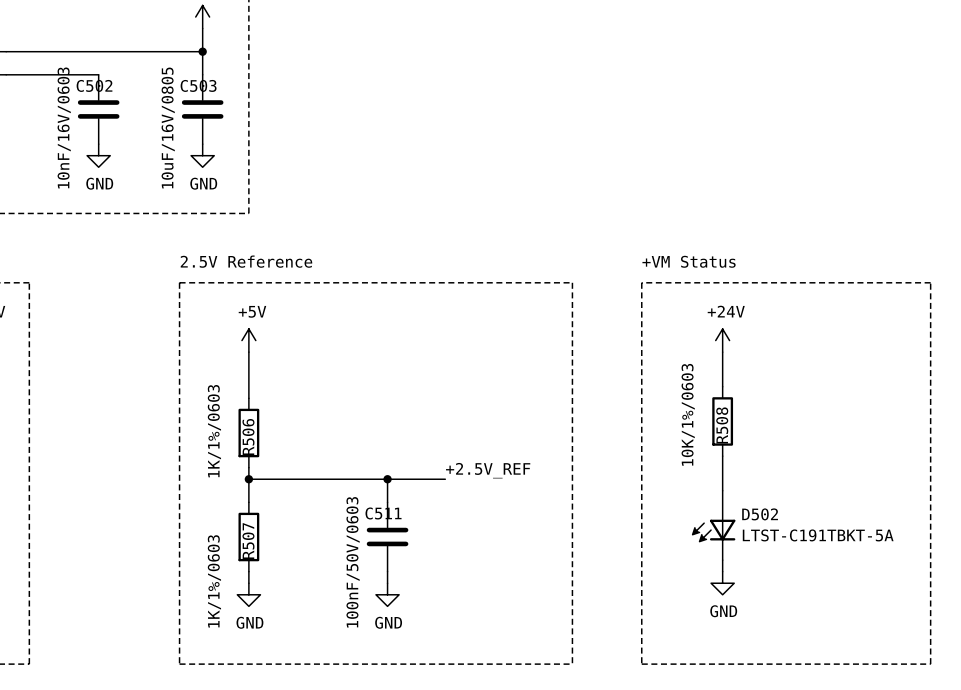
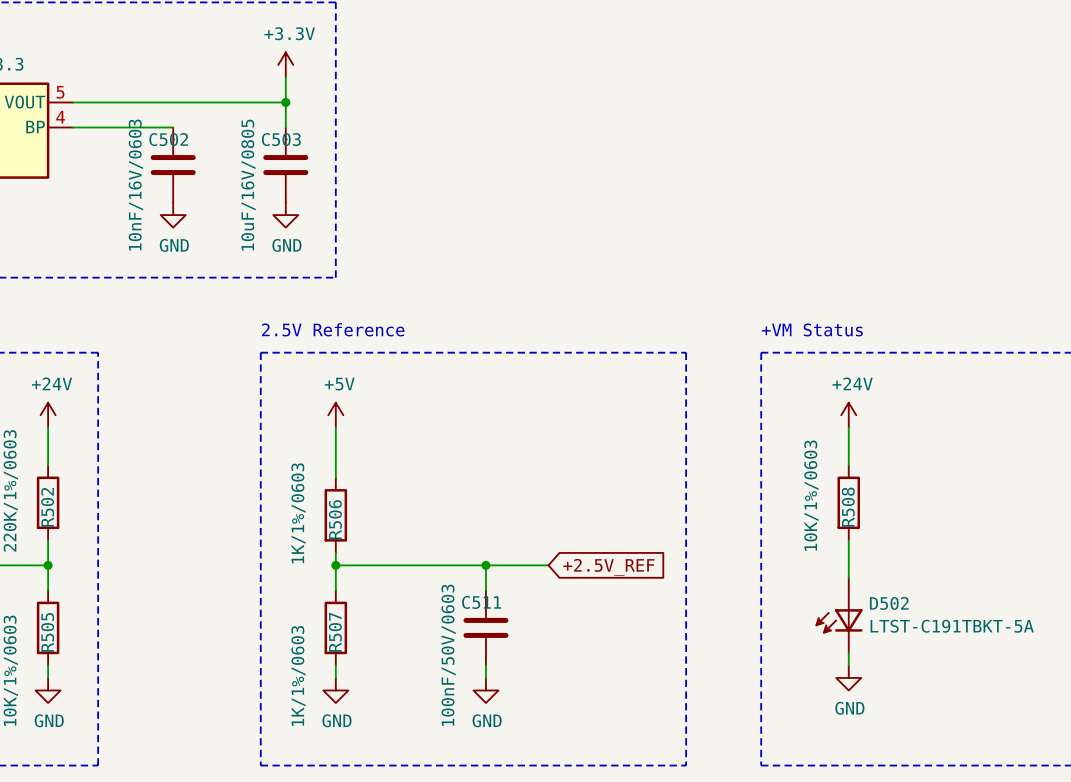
label: +2.5V_REF (488, 470) -> none
global label: none -> +2.5V_REF (608, 567)

